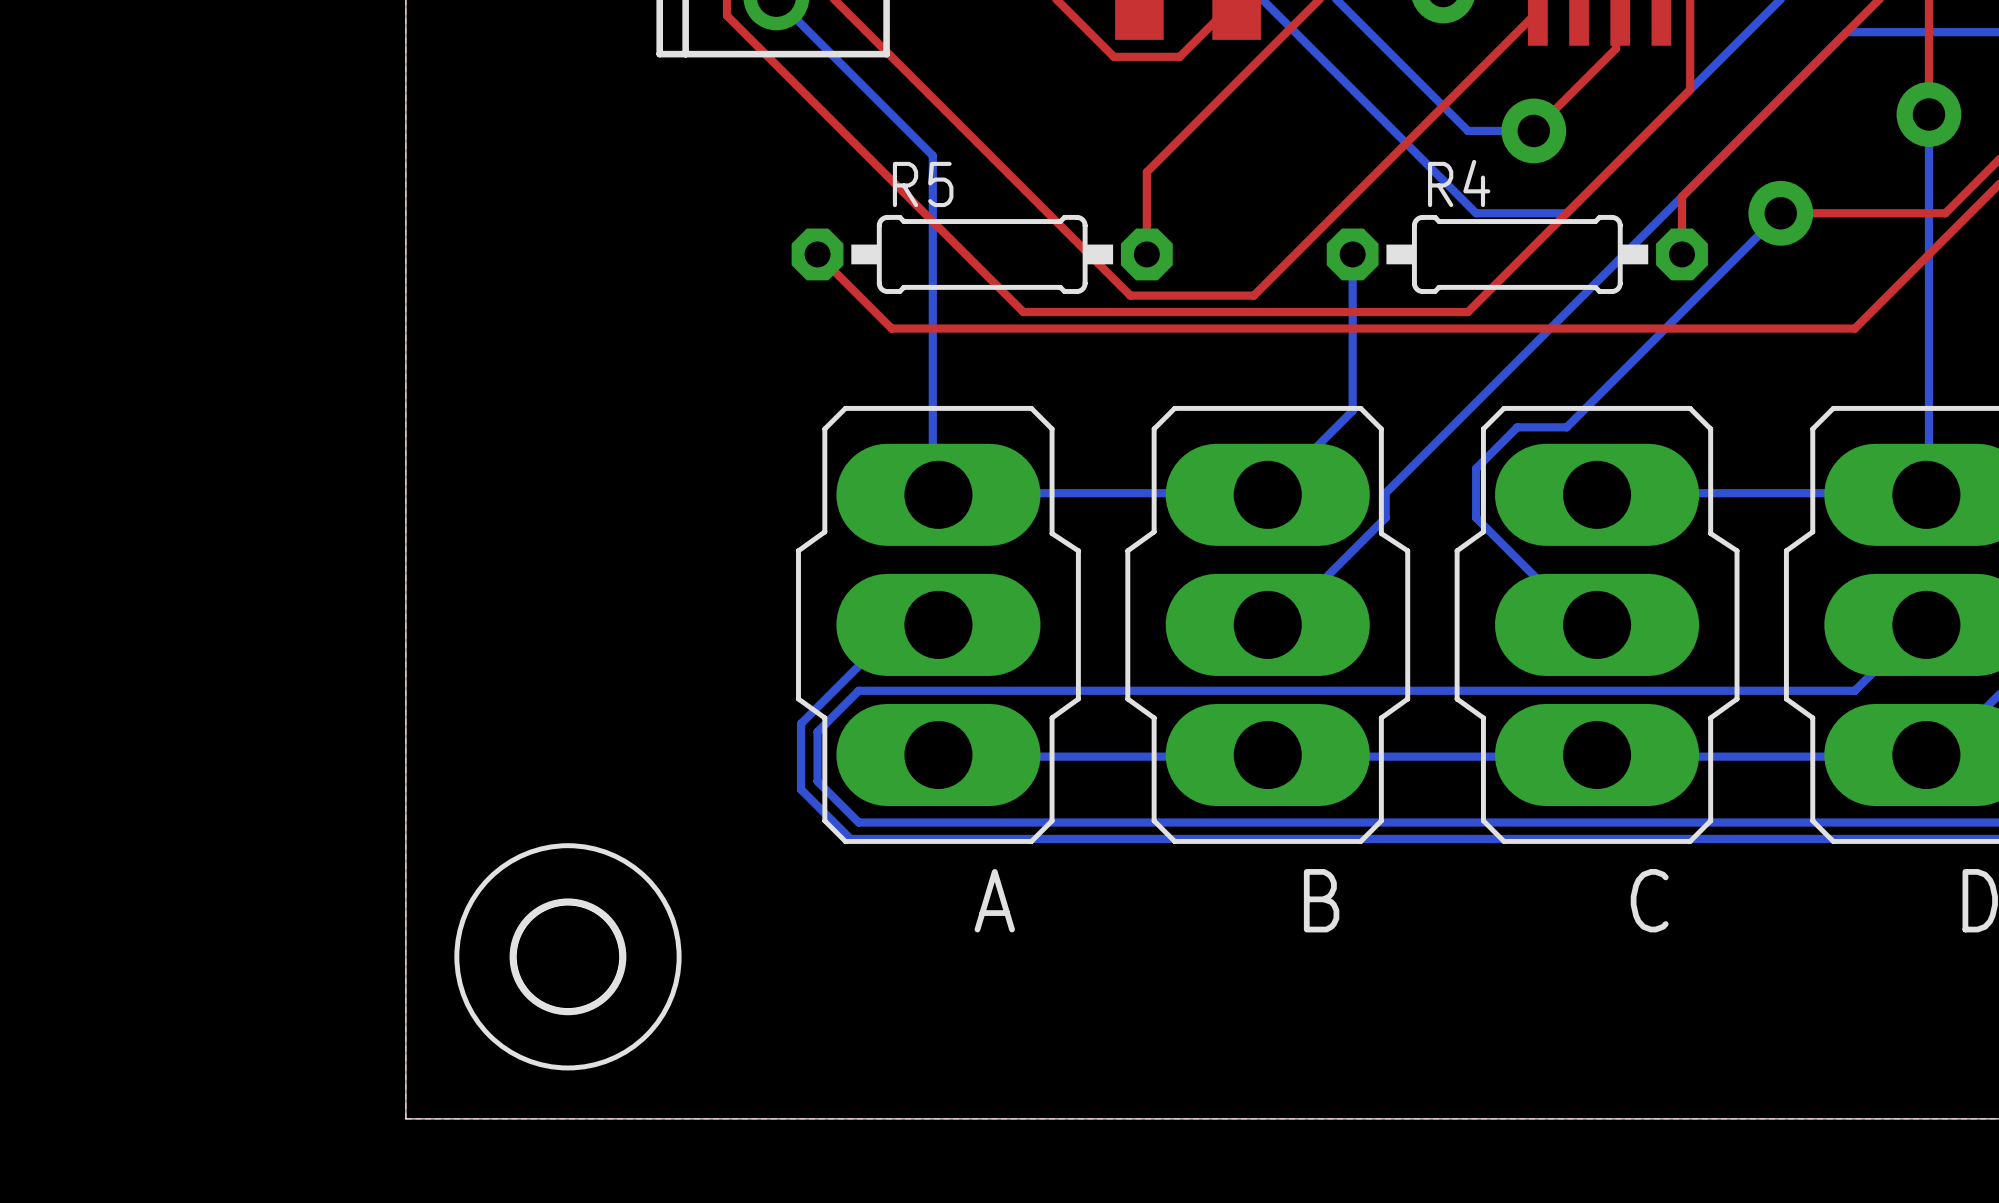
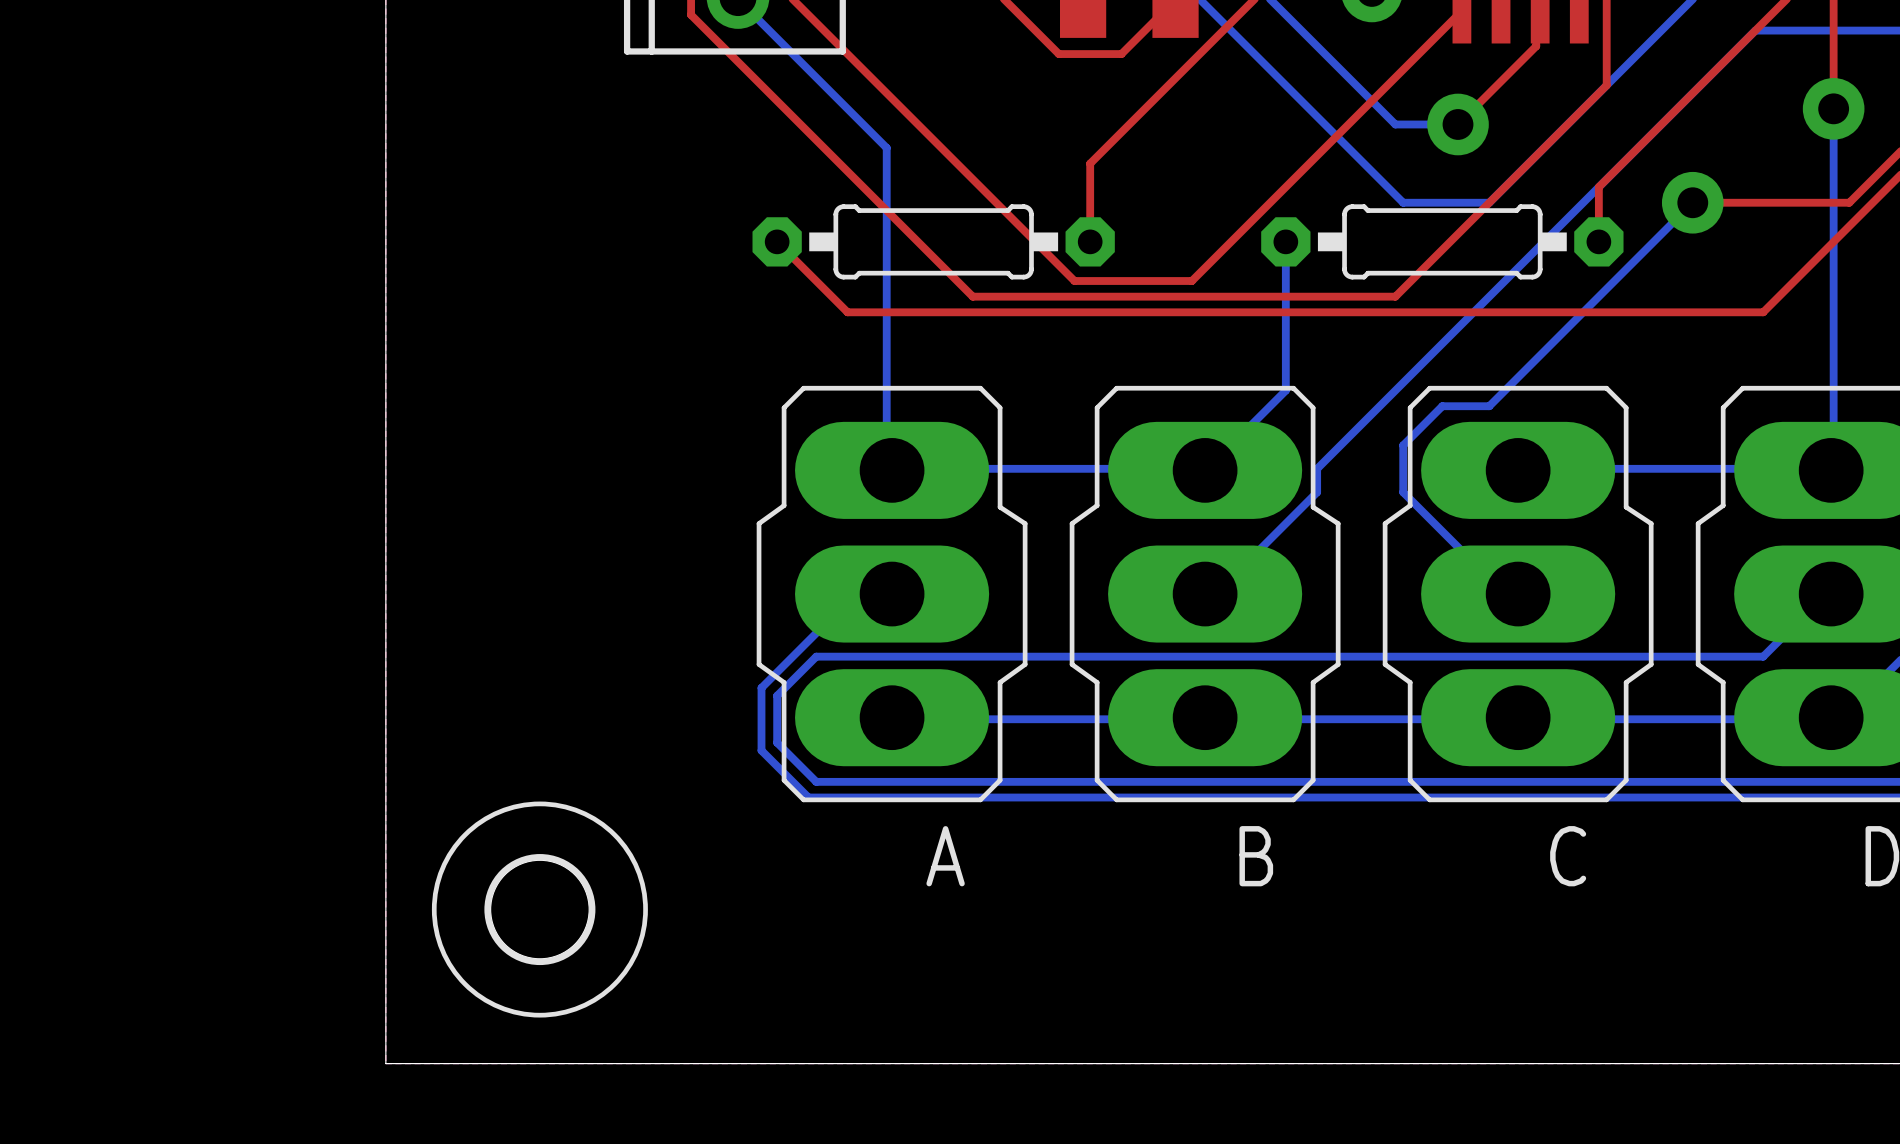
R4 name: R4 (1459, 183) -> none
R5 name: R5 (923, 184) -> none

